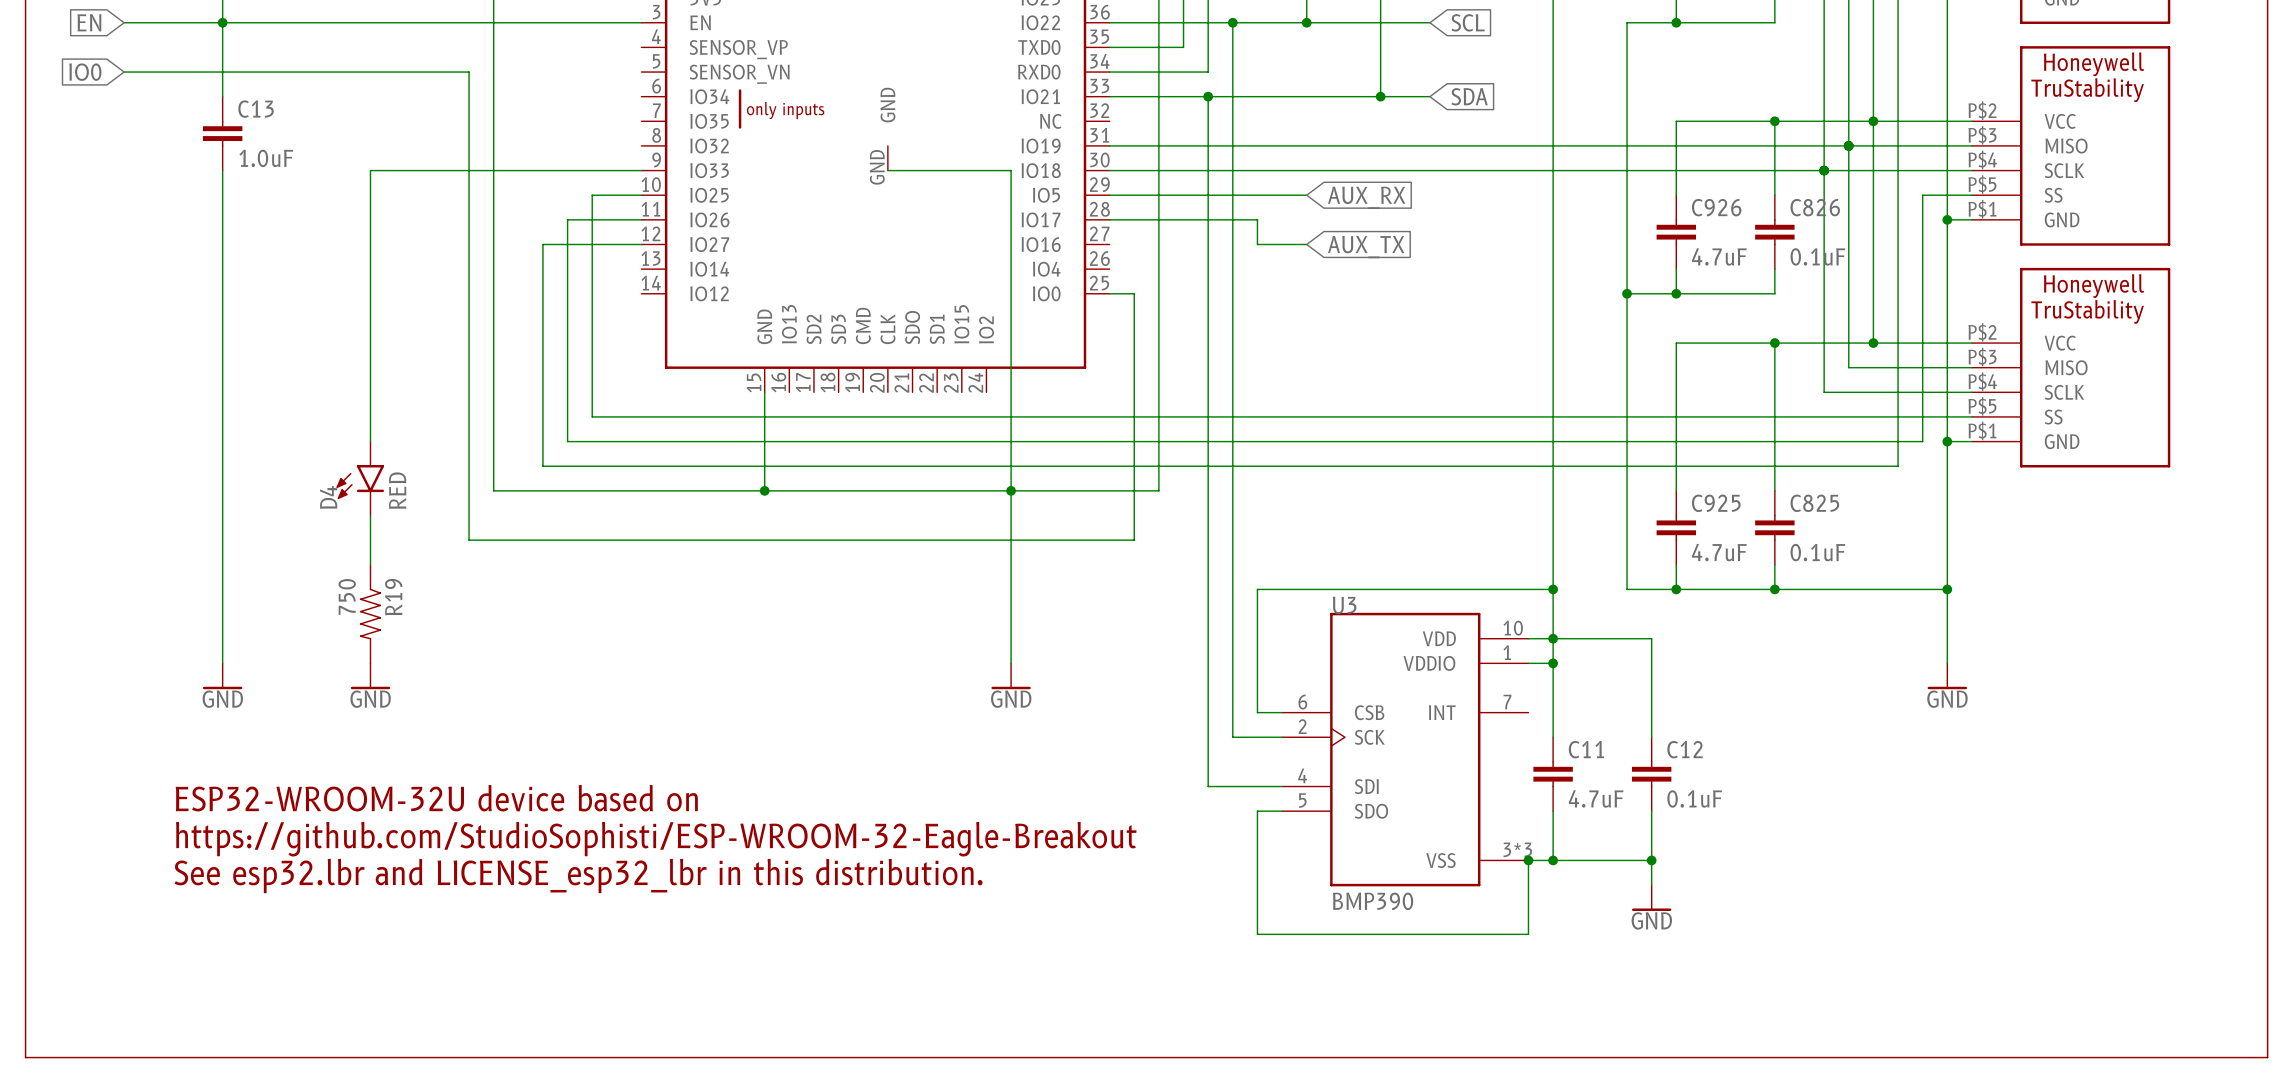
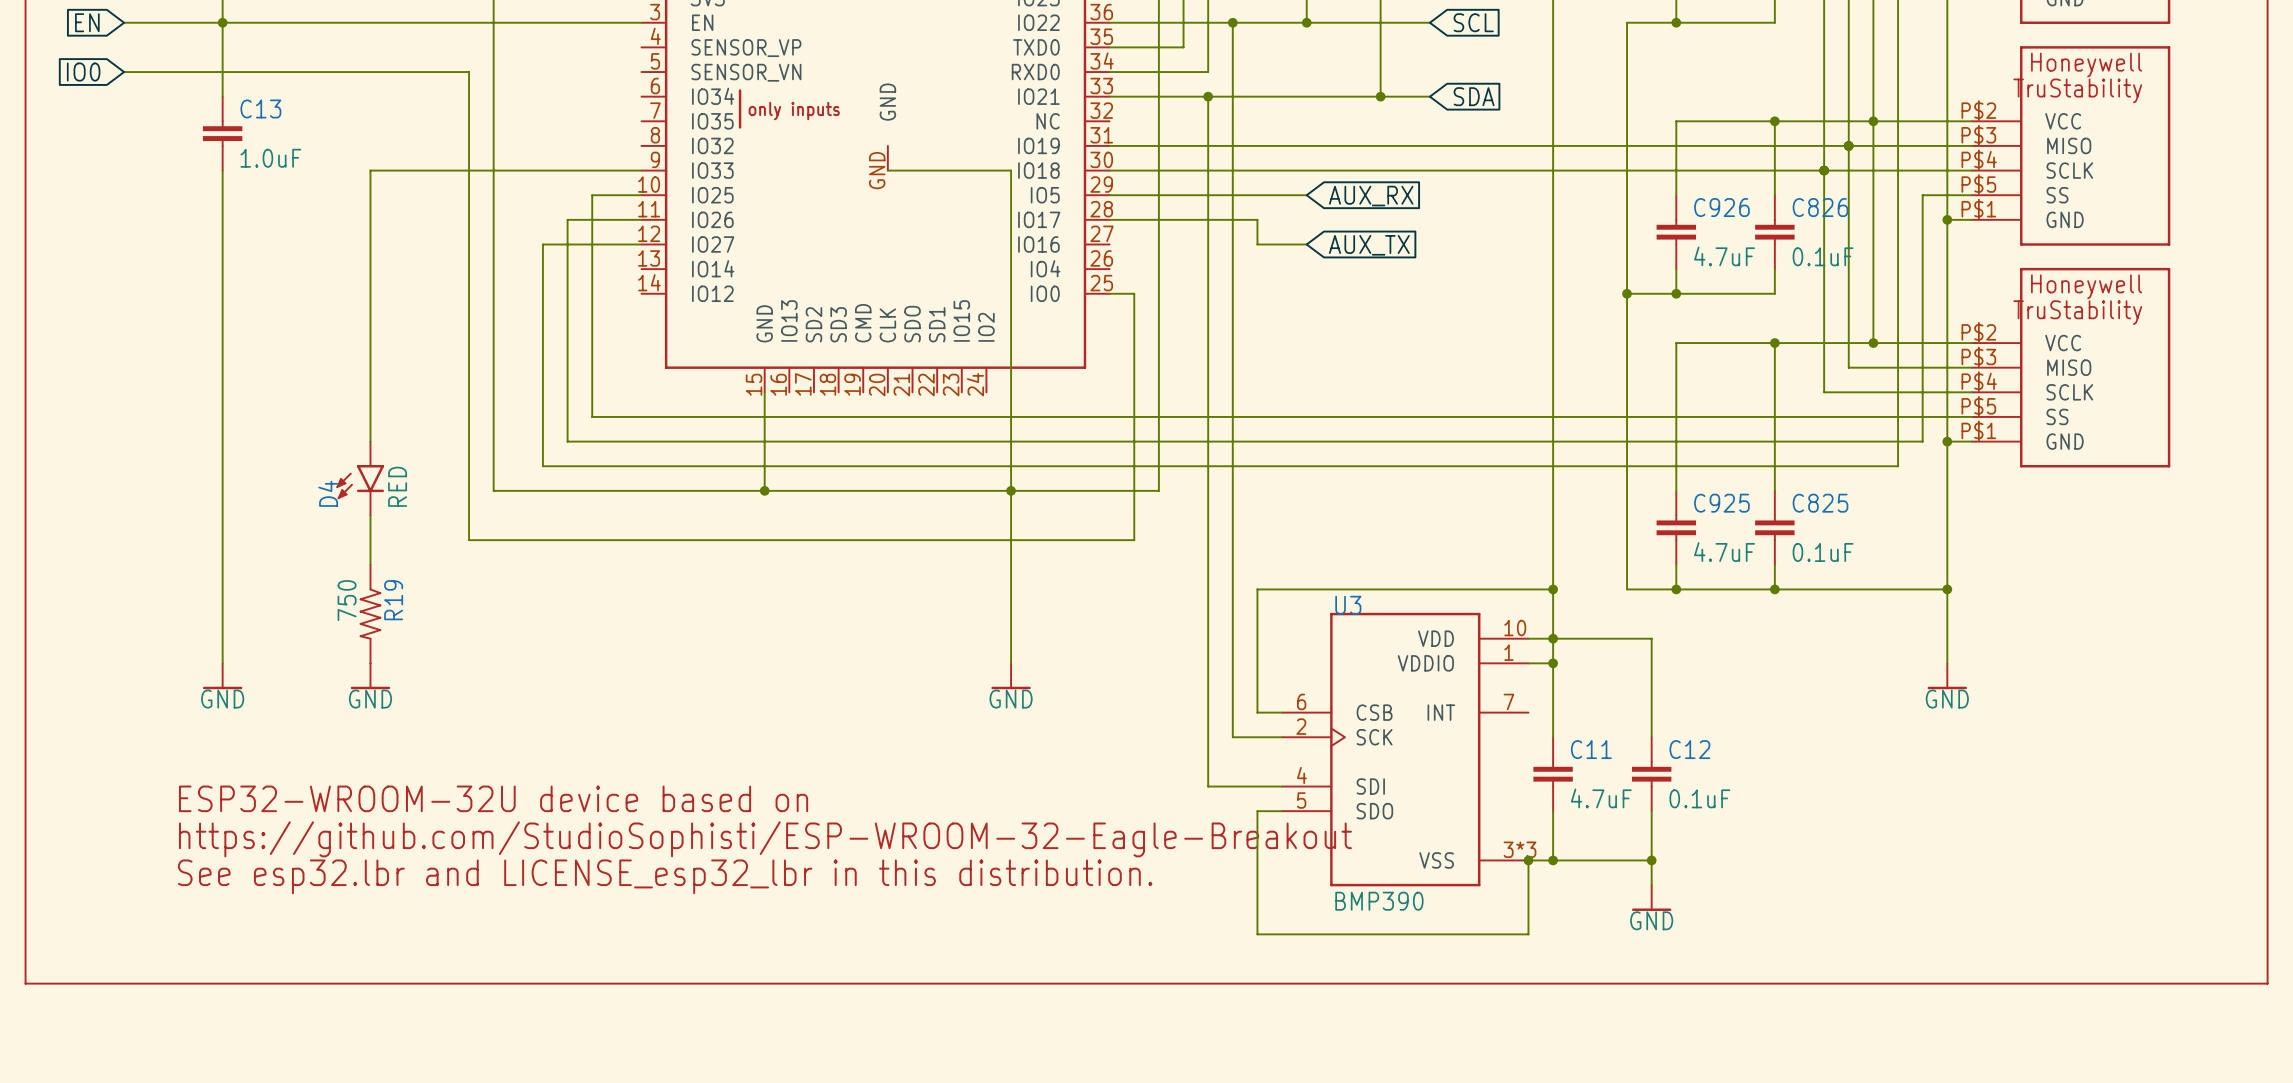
line: (25, 983) (25, 1057) (2267, 1057) (2267, 983) -> (25, 983) (2267, 983)

